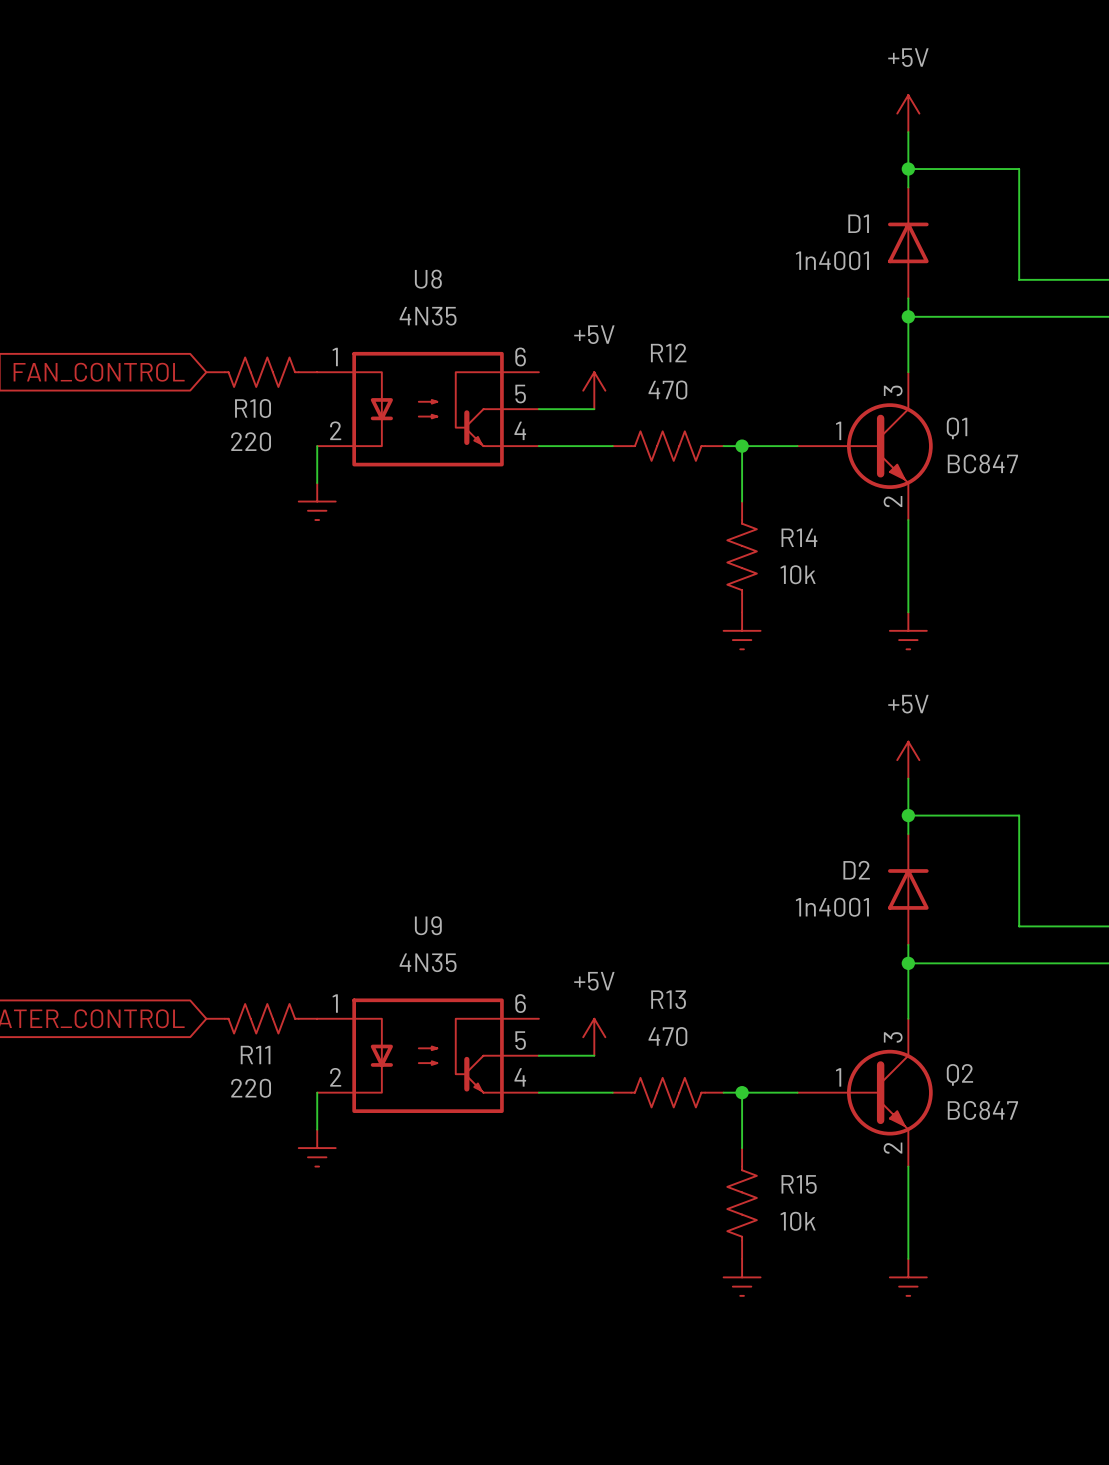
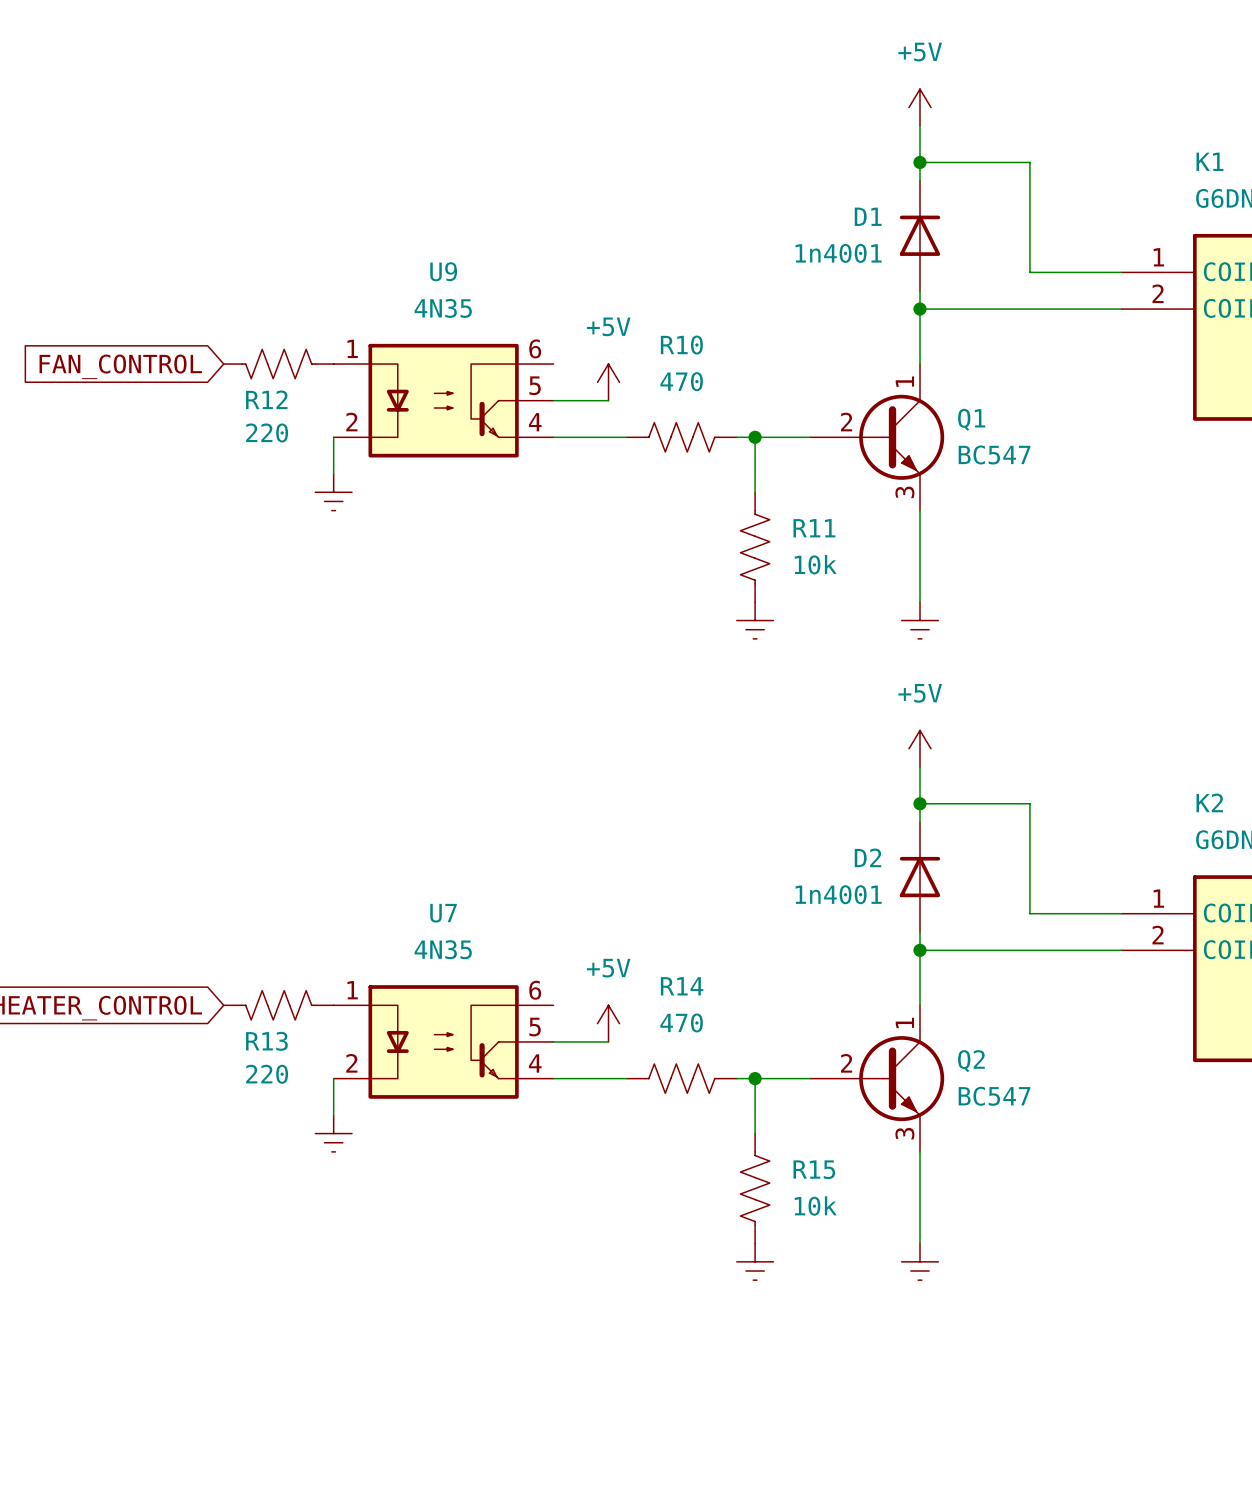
U8 name: U8 (428, 279) -> U9 (443, 271)
R12 name: R12 (668, 352) -> R10 (681, 345)
Q1 symbol: [797, 372, 933, 521] -> [810, 364, 945, 511]
R10 name: R10 (253, 408) -> R12 (266, 399)
Q1 value: BC847 (982, 463) -> BC547 (994, 454)
R14 name: R14 (799, 537) -> R11 (814, 528)
U9 name: U9 (428, 925) -> U7 (443, 913)
R13 name: R13 (668, 999) -> R14 (682, 986)
Q2 symbol: [797, 1018, 933, 1167] -> [810, 1005, 945, 1152]
R11 name: R11 (255, 1055) -> R13 (266, 1041)
Q2 value: BC847 (982, 1110) -> BC547 (994, 1096)

